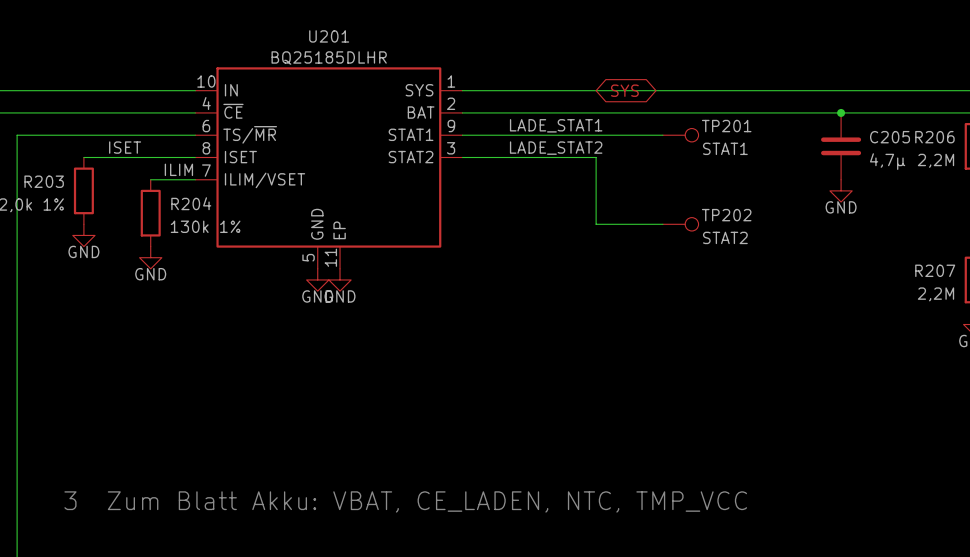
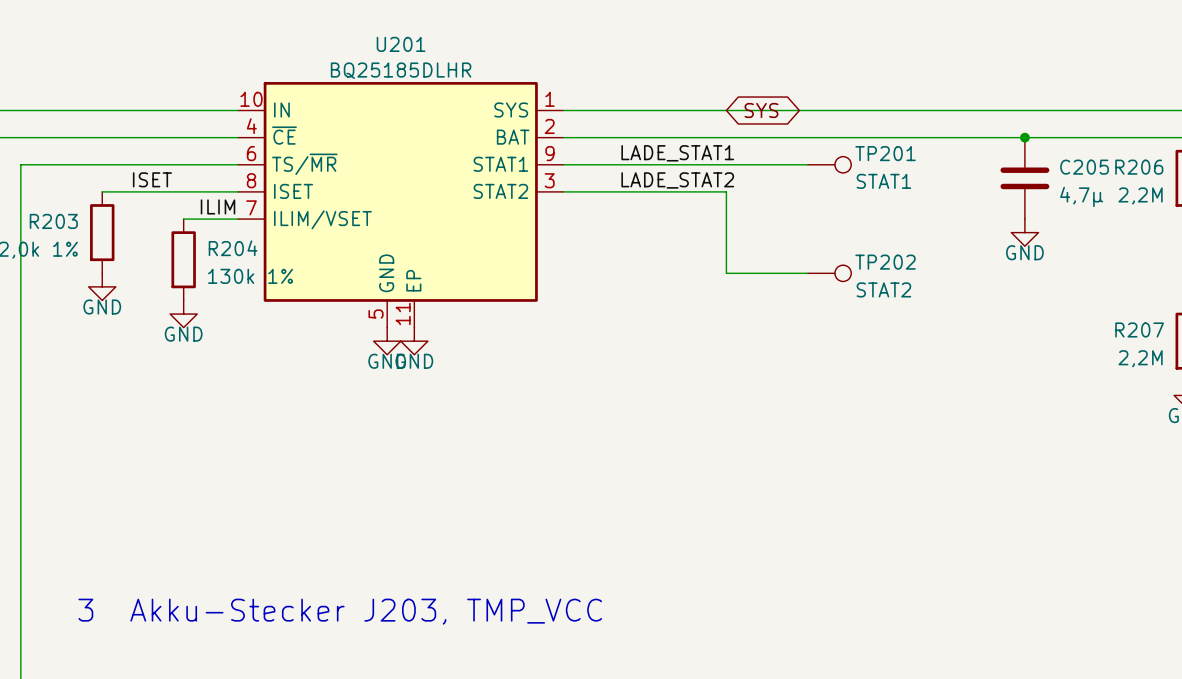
text: 3 Zum Blatt Akku: VBAT, CE_LADEN, NTC, TMP_VCC (405, 501) -> 3 Akku-Stecker J203, TMP_VCC (340, 611)

